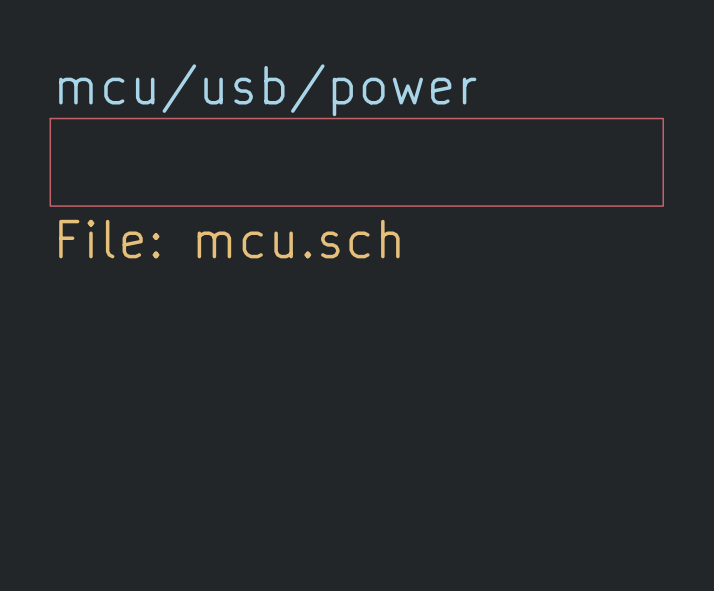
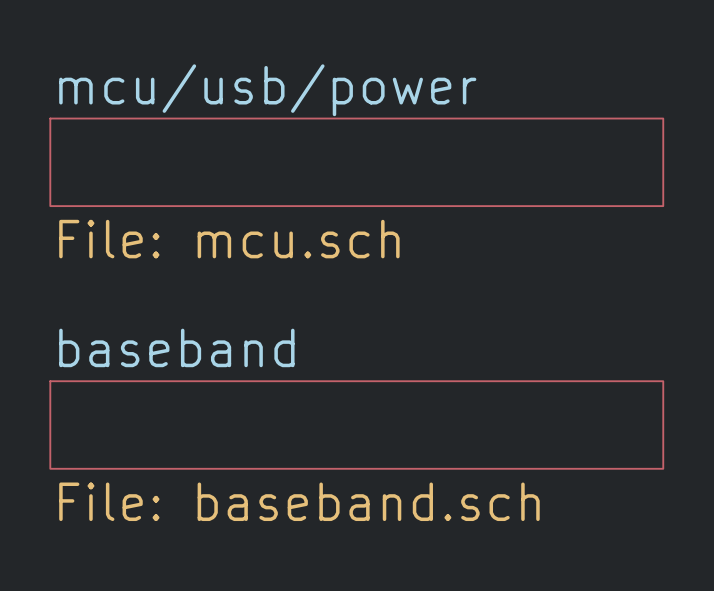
sheet baseband: none -> File: baseband.sch (356, 425)

